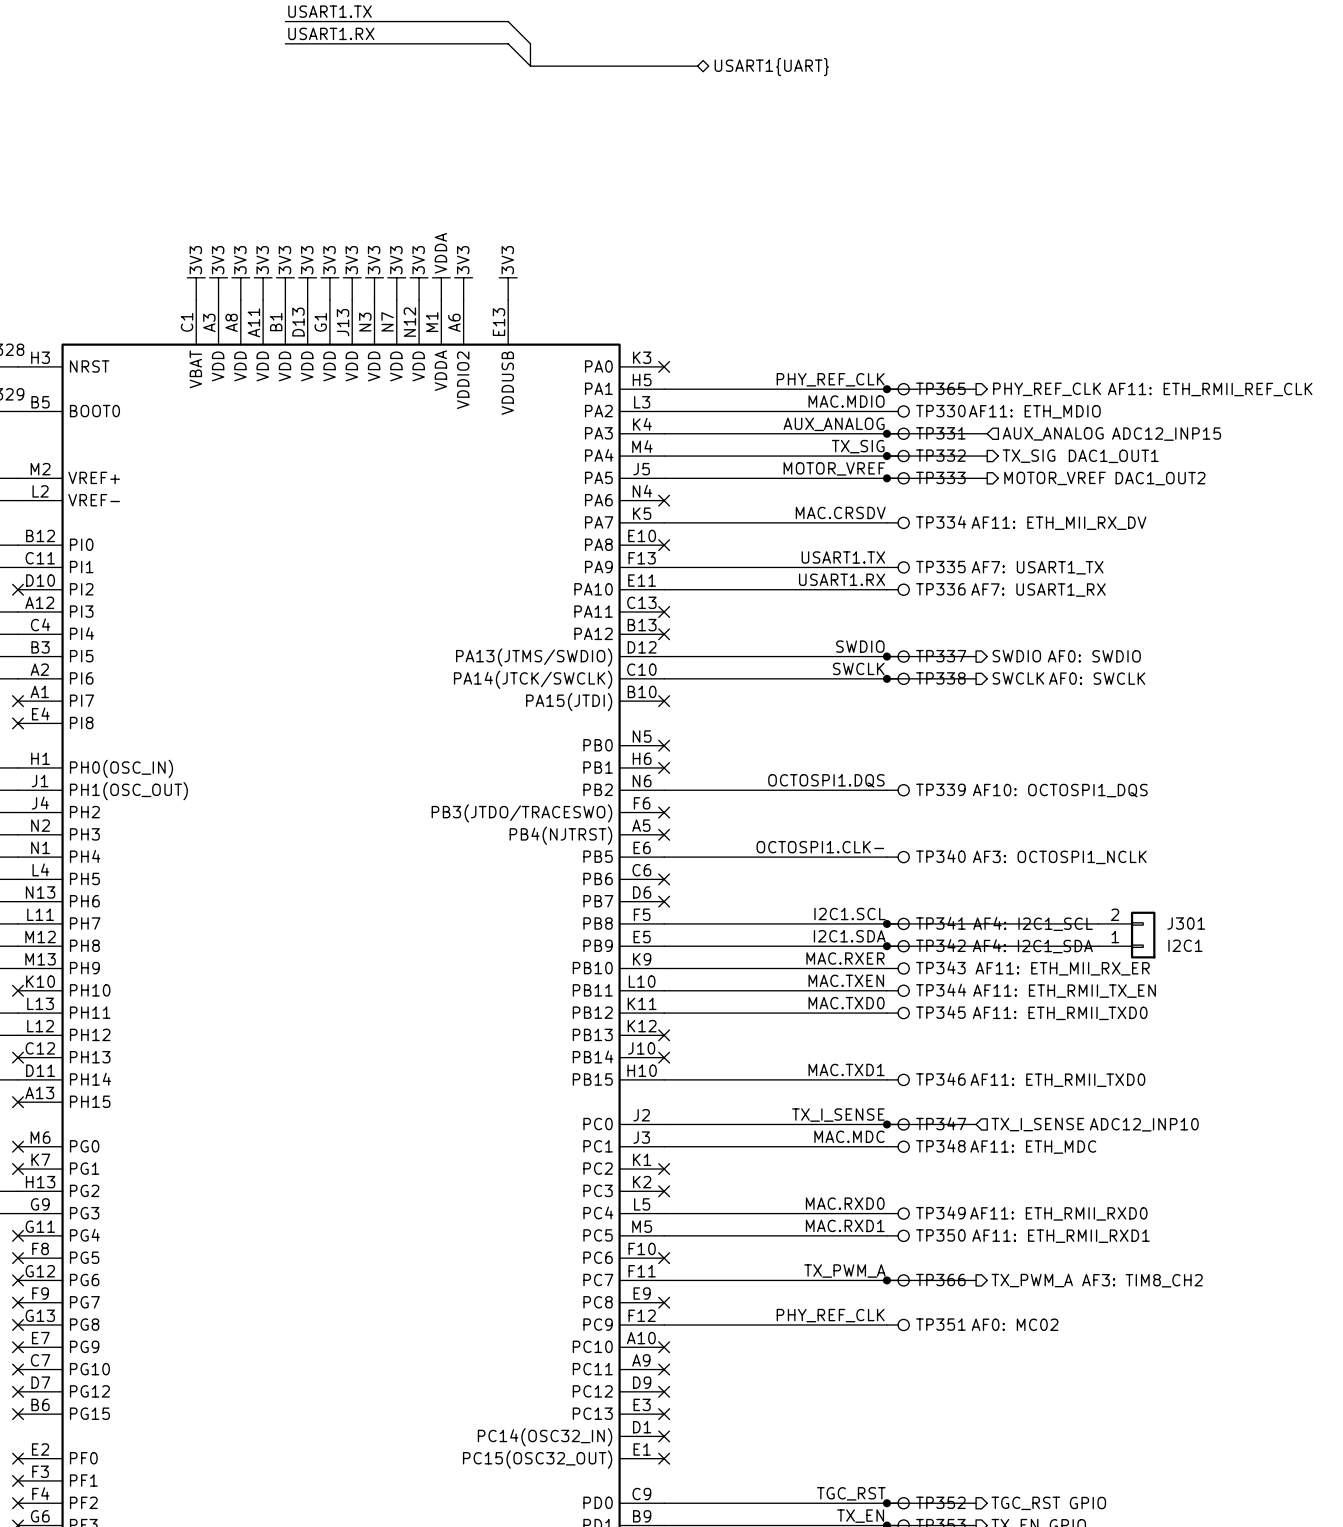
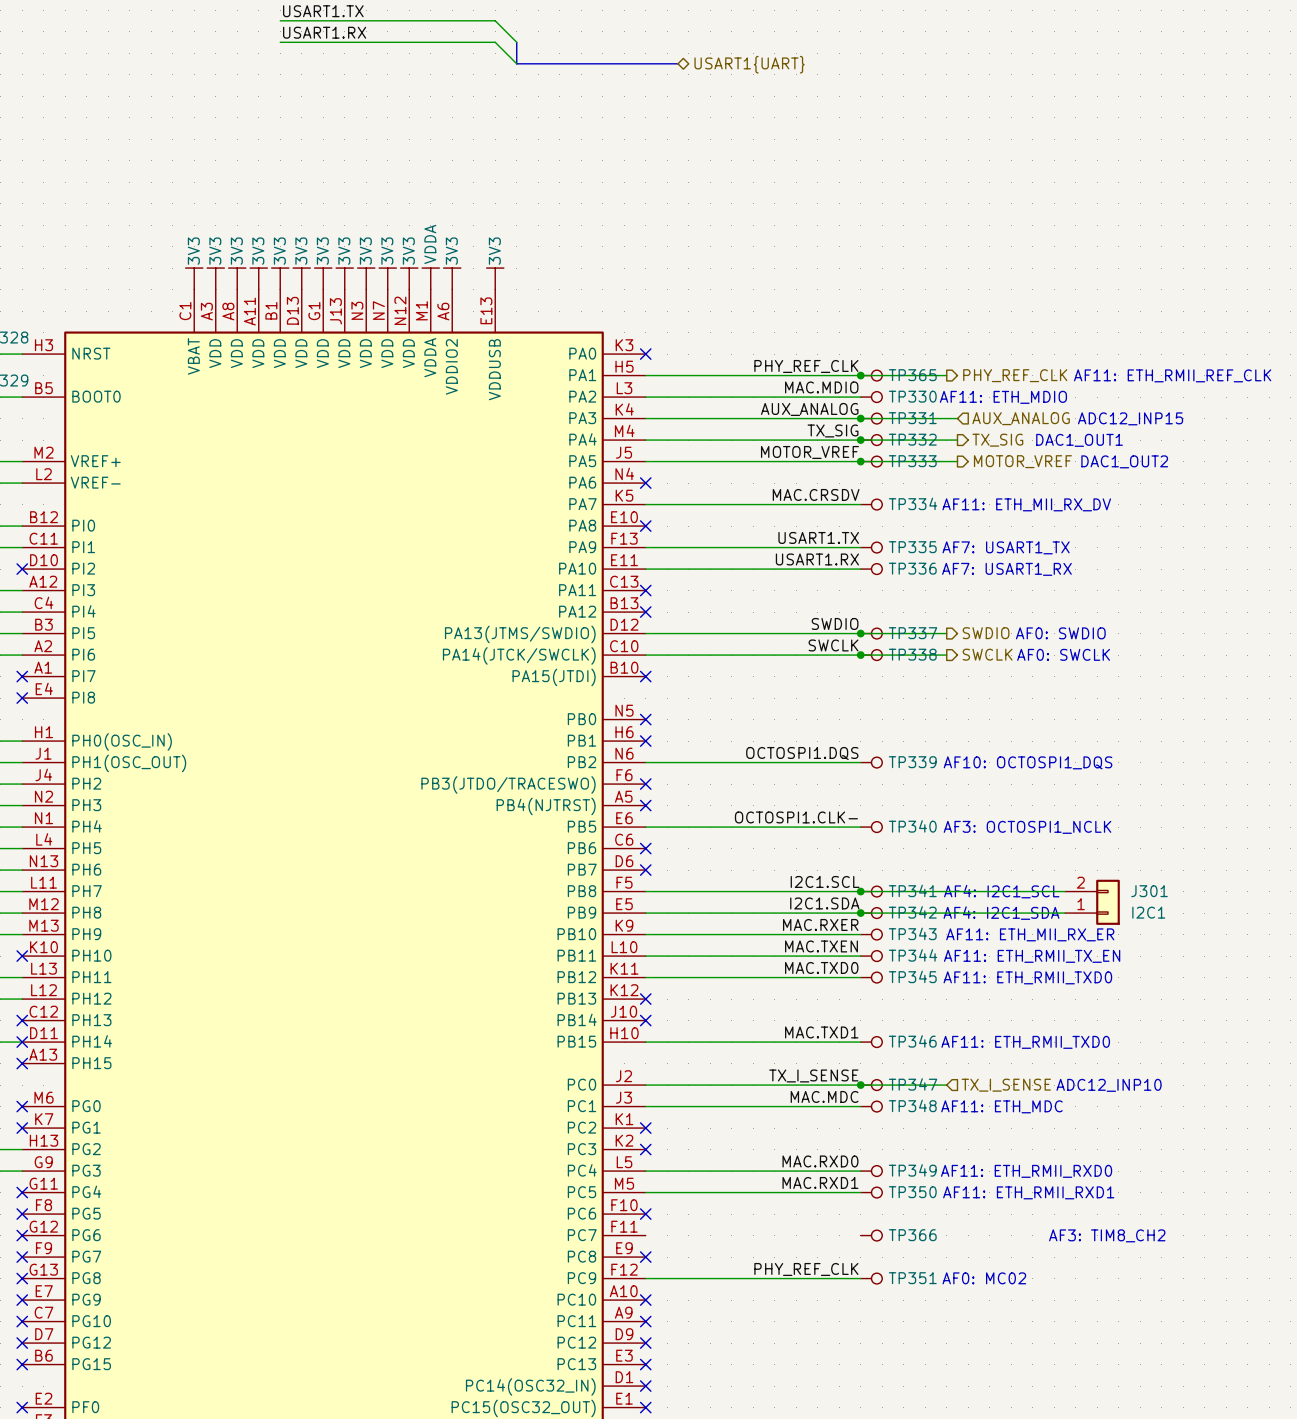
no-connect mark: none -> (22, 1042)
label: TX_PWM_A (844, 1271) -> none
wire: (664, 1280) (976, 1280) -> none
junction: (886, 1280) -> none
hierarchical label: TX_PWM_A (1032, 1280) -> none

